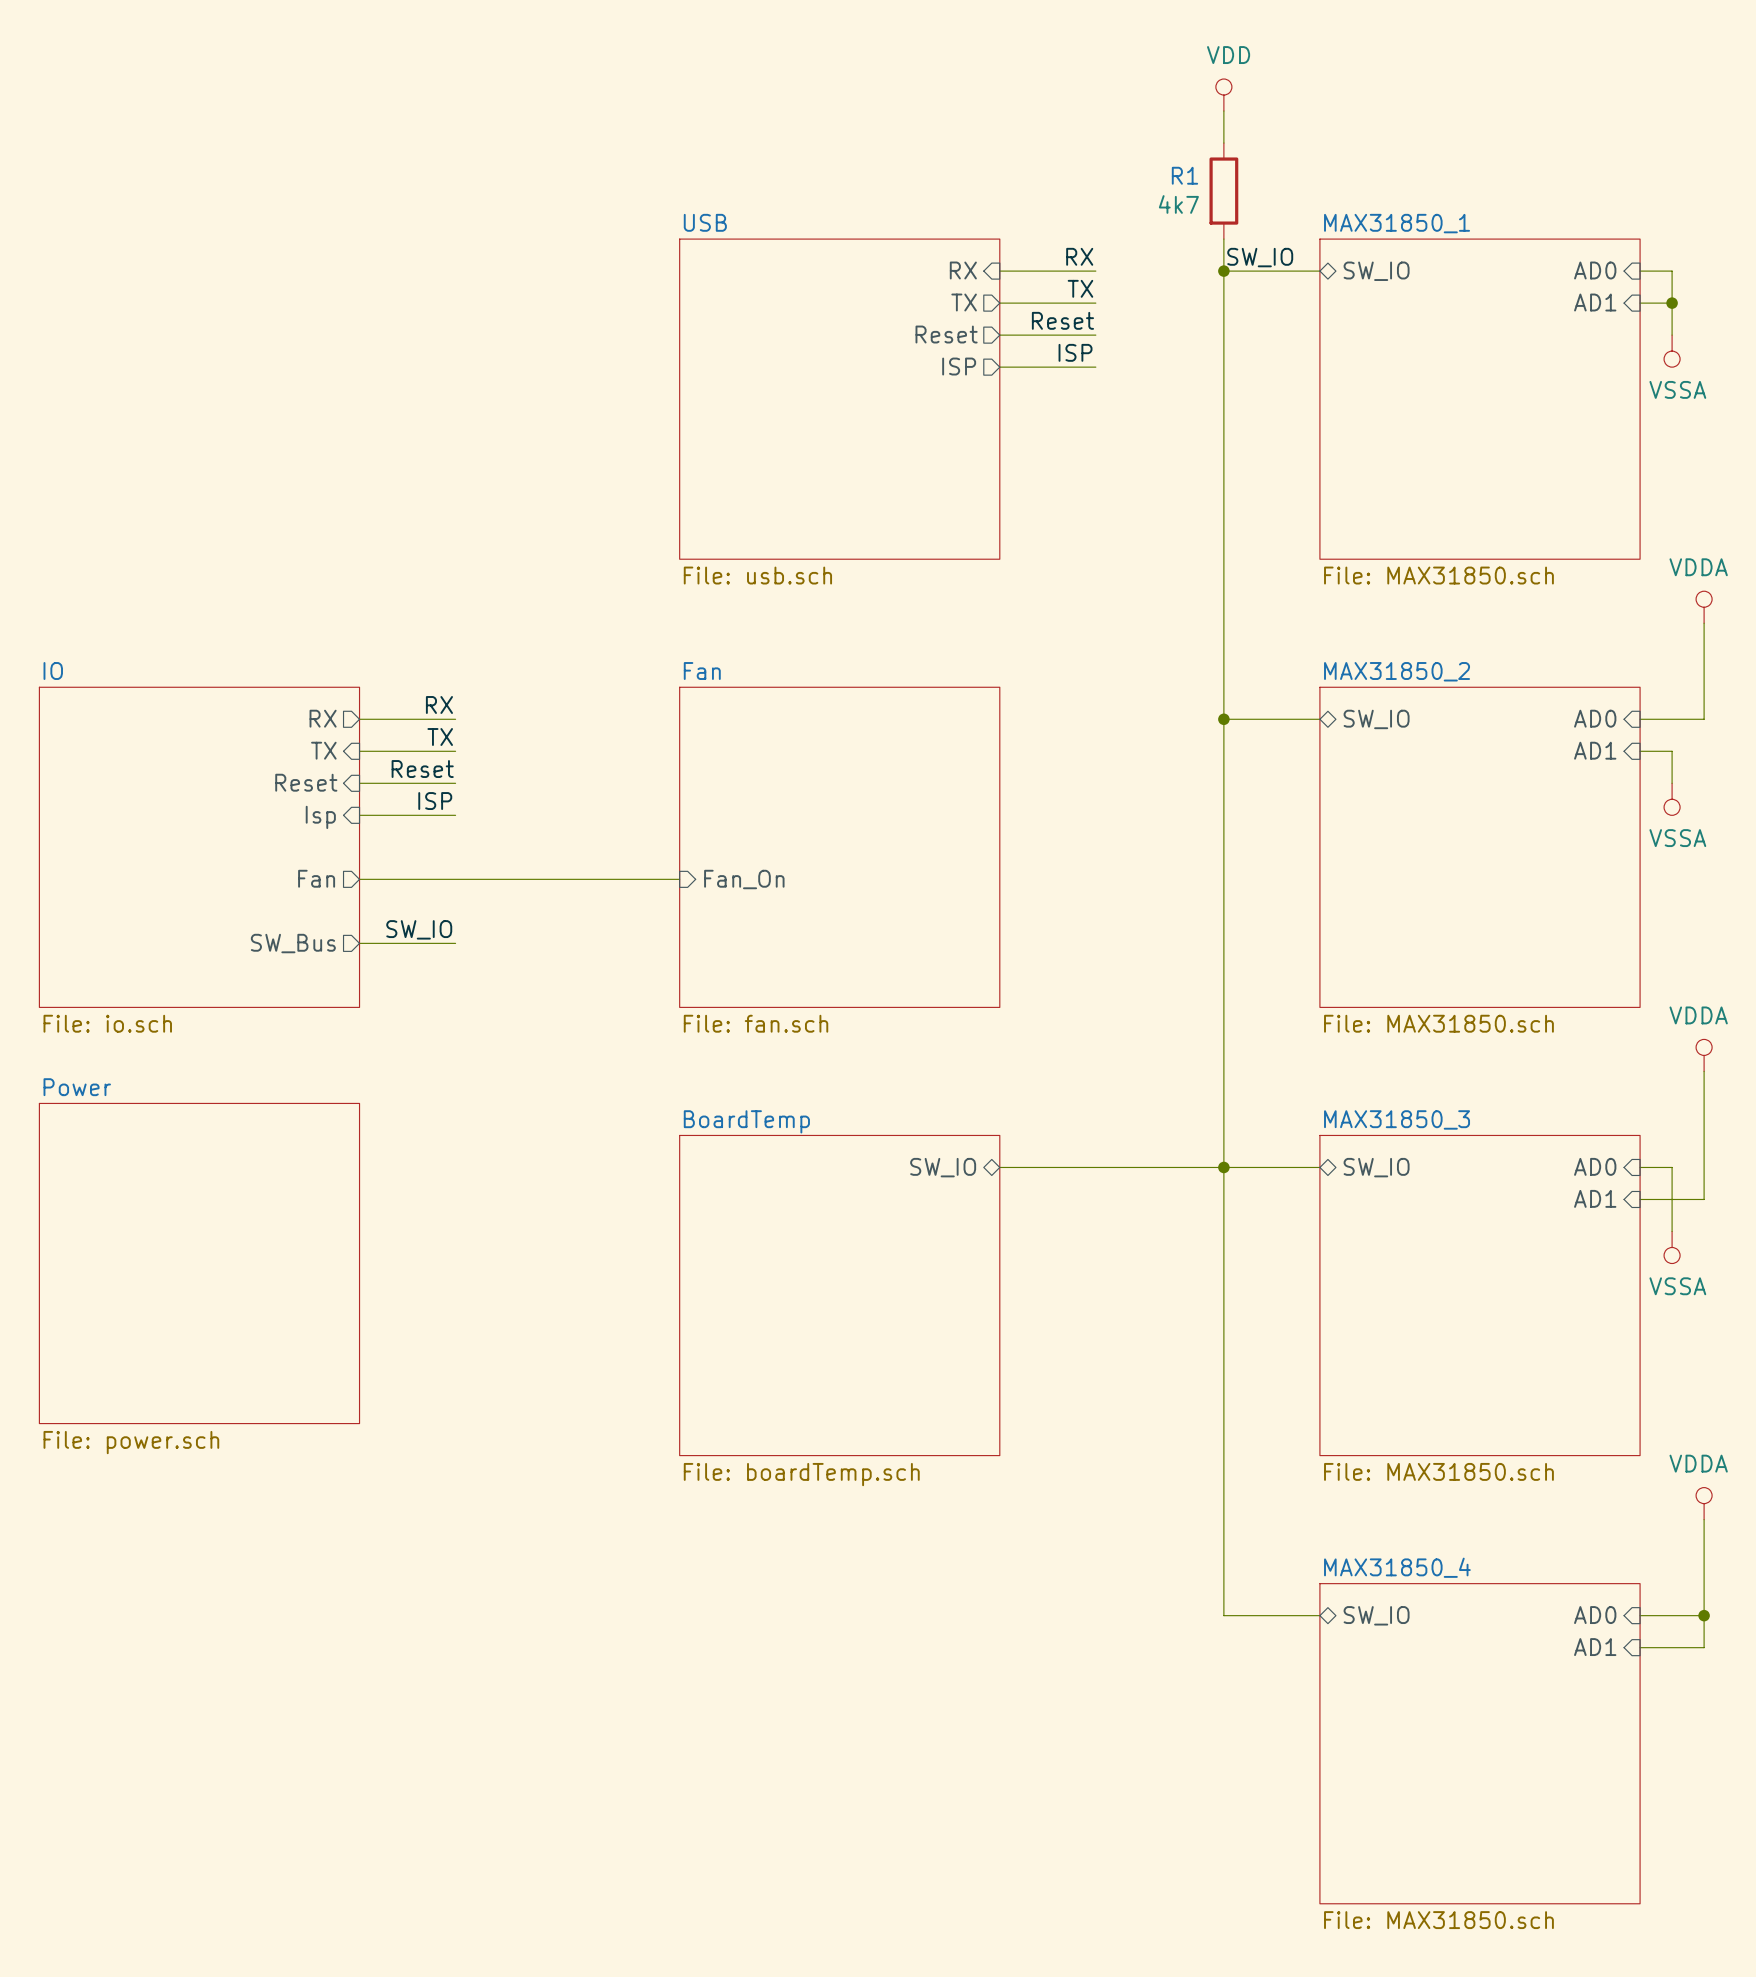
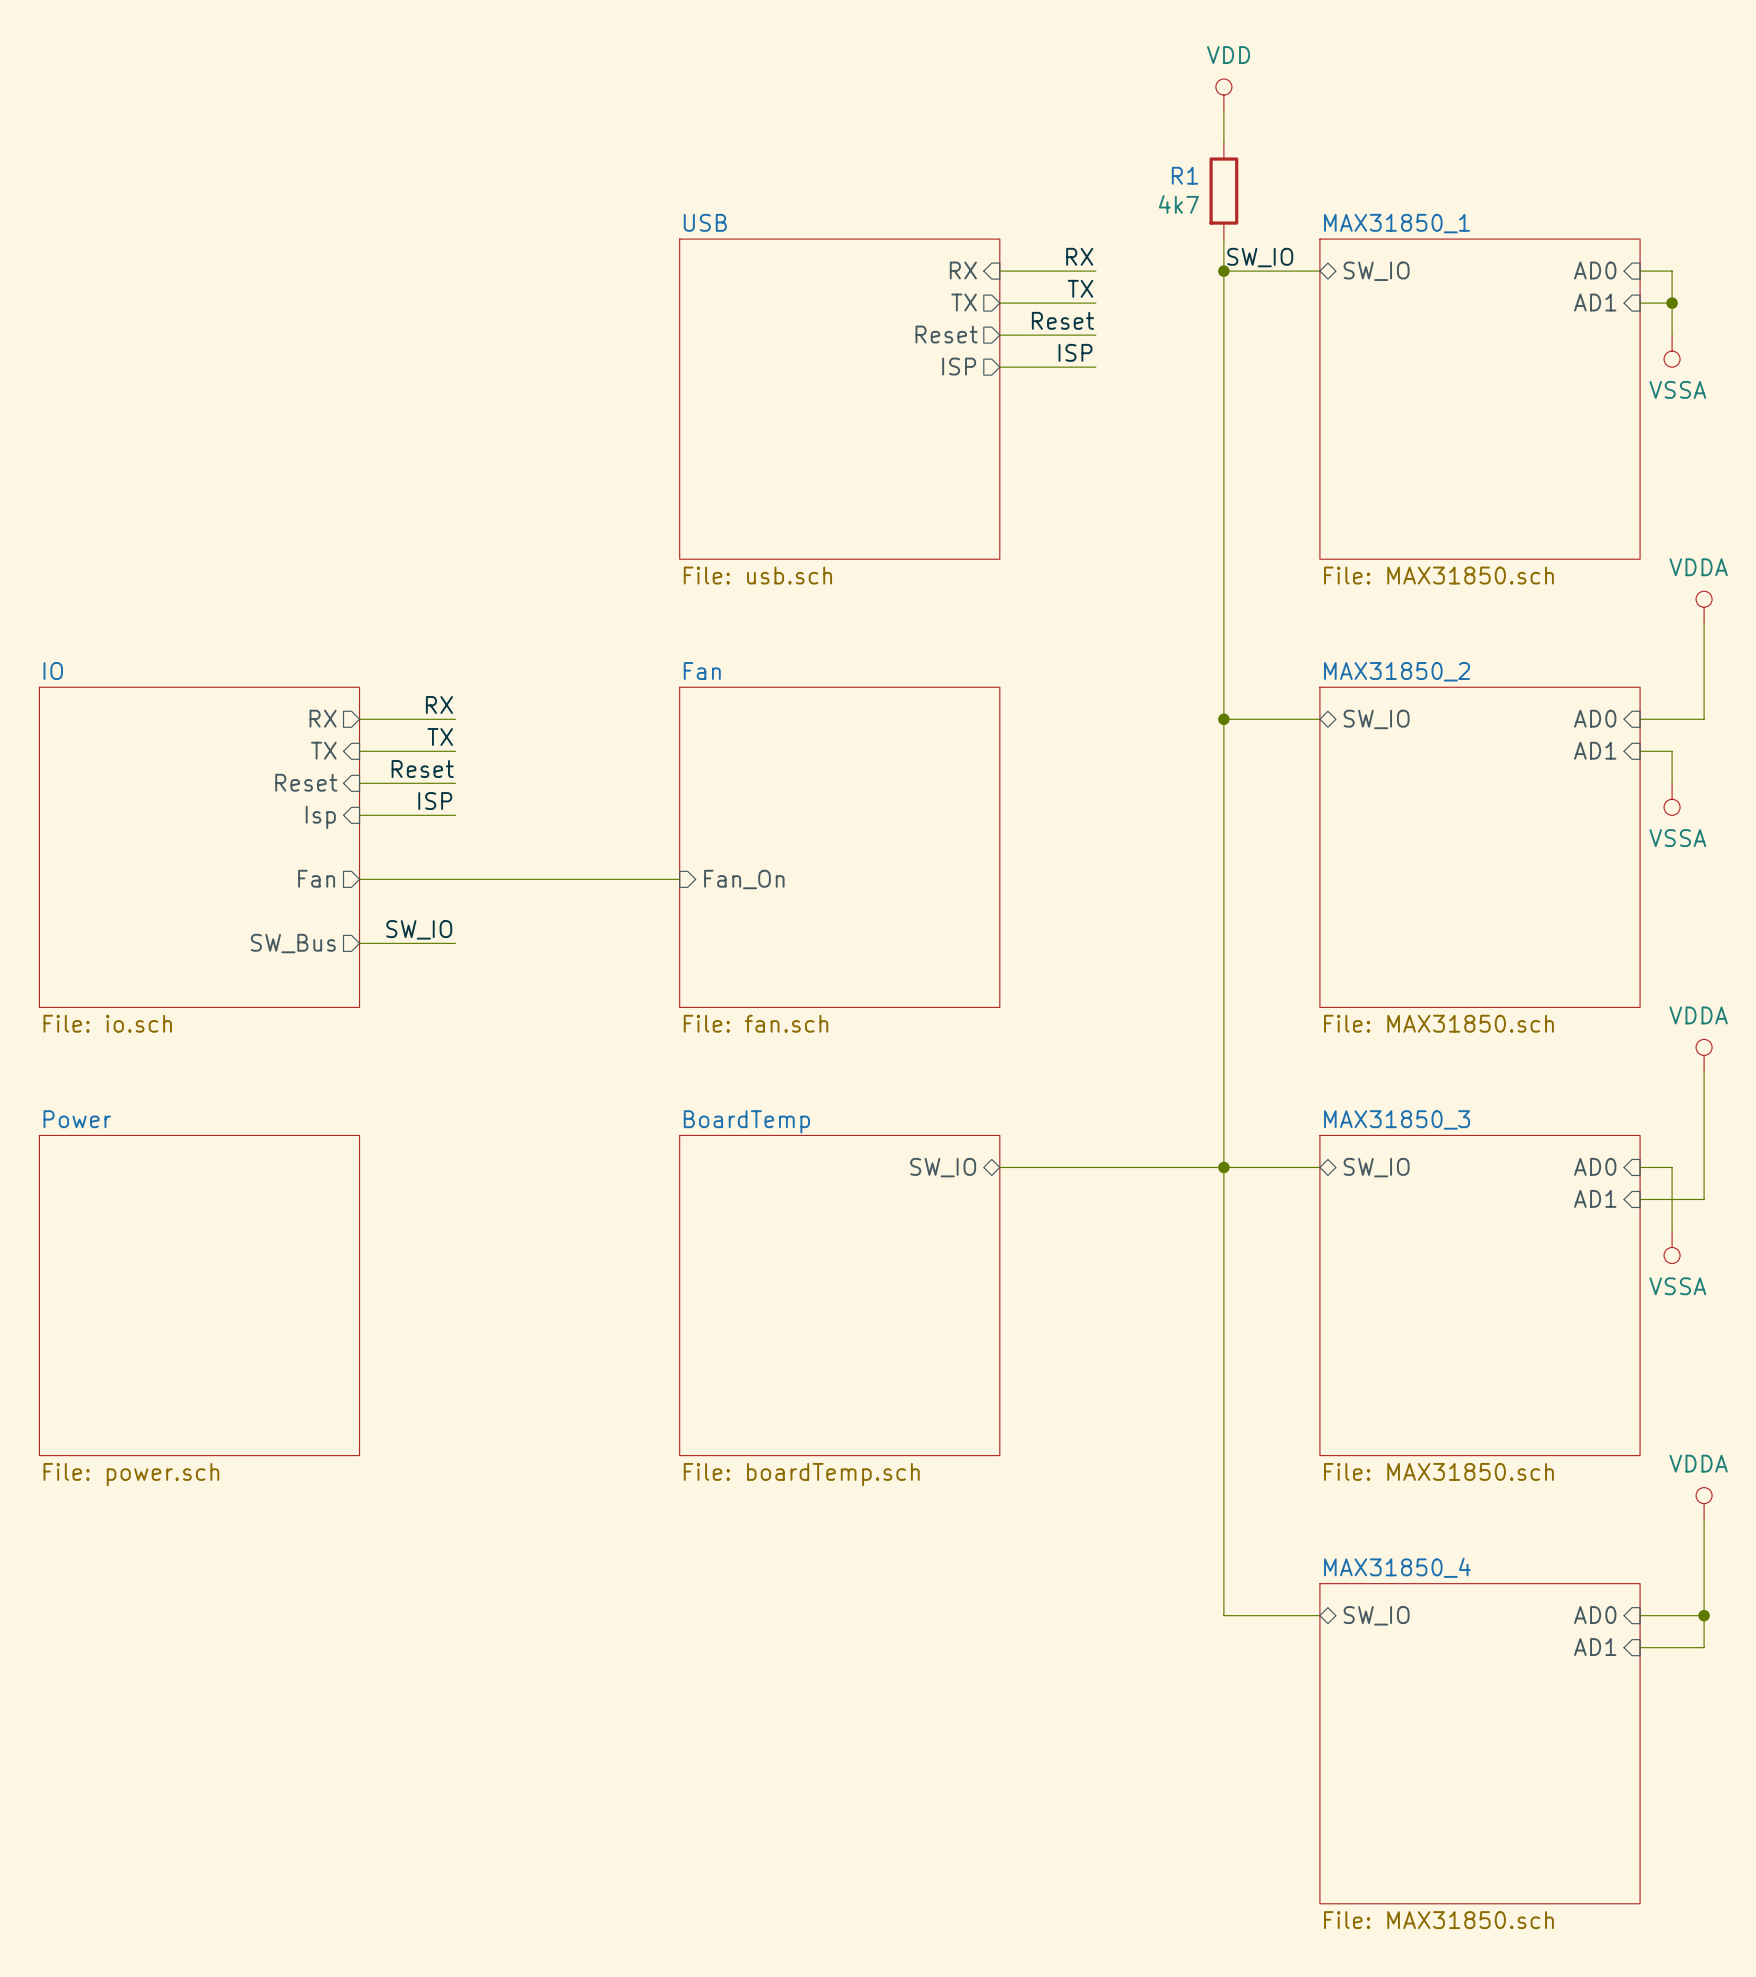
sheet Power position: (199, 1263) -> (199, 1295)

